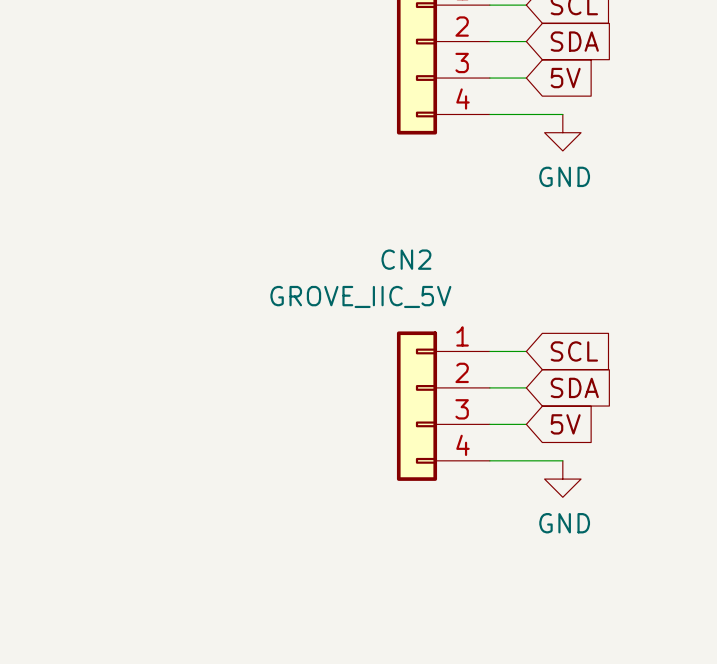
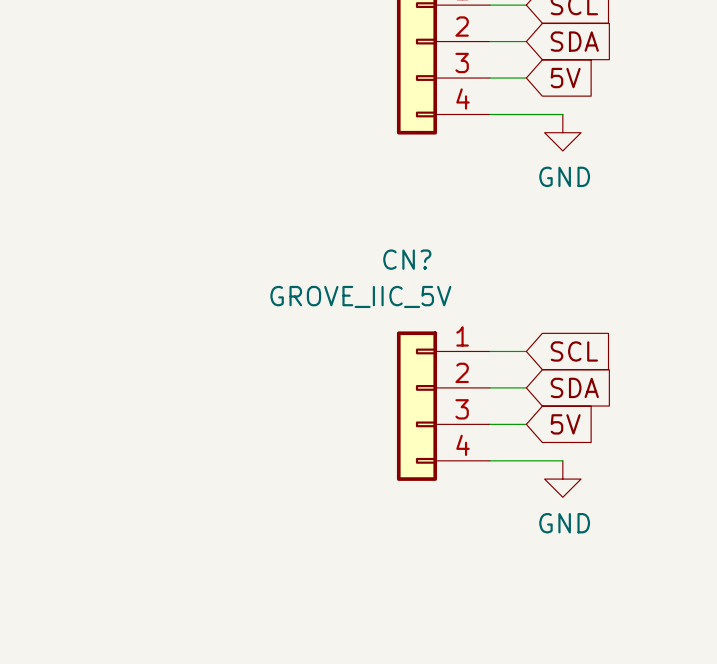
CN2 name: CN2 (406, 259) -> CN? (407, 259)

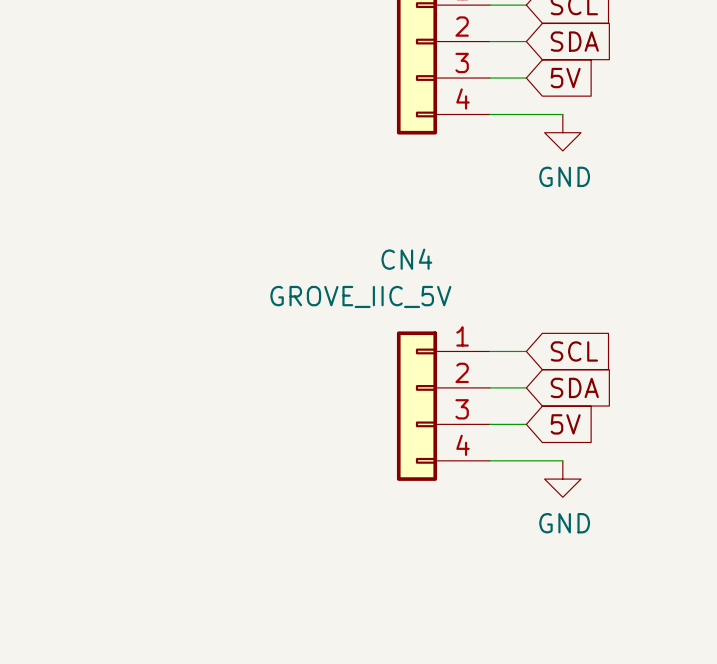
CN? name: CN? (407, 259) -> CN4 (406, 259)

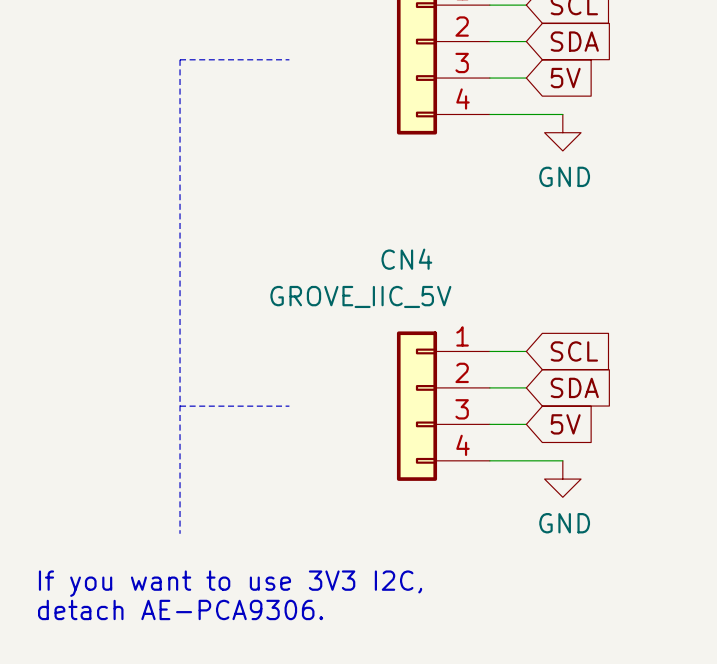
line: none -> (289, 59) (180, 59) (180, 533)
line: none -> (180, 406) (289, 406)
text: none -> If you want to use 3V3 I2C, (230, 583)
text: none -> detach AE-PCA9306. (180, 609)

